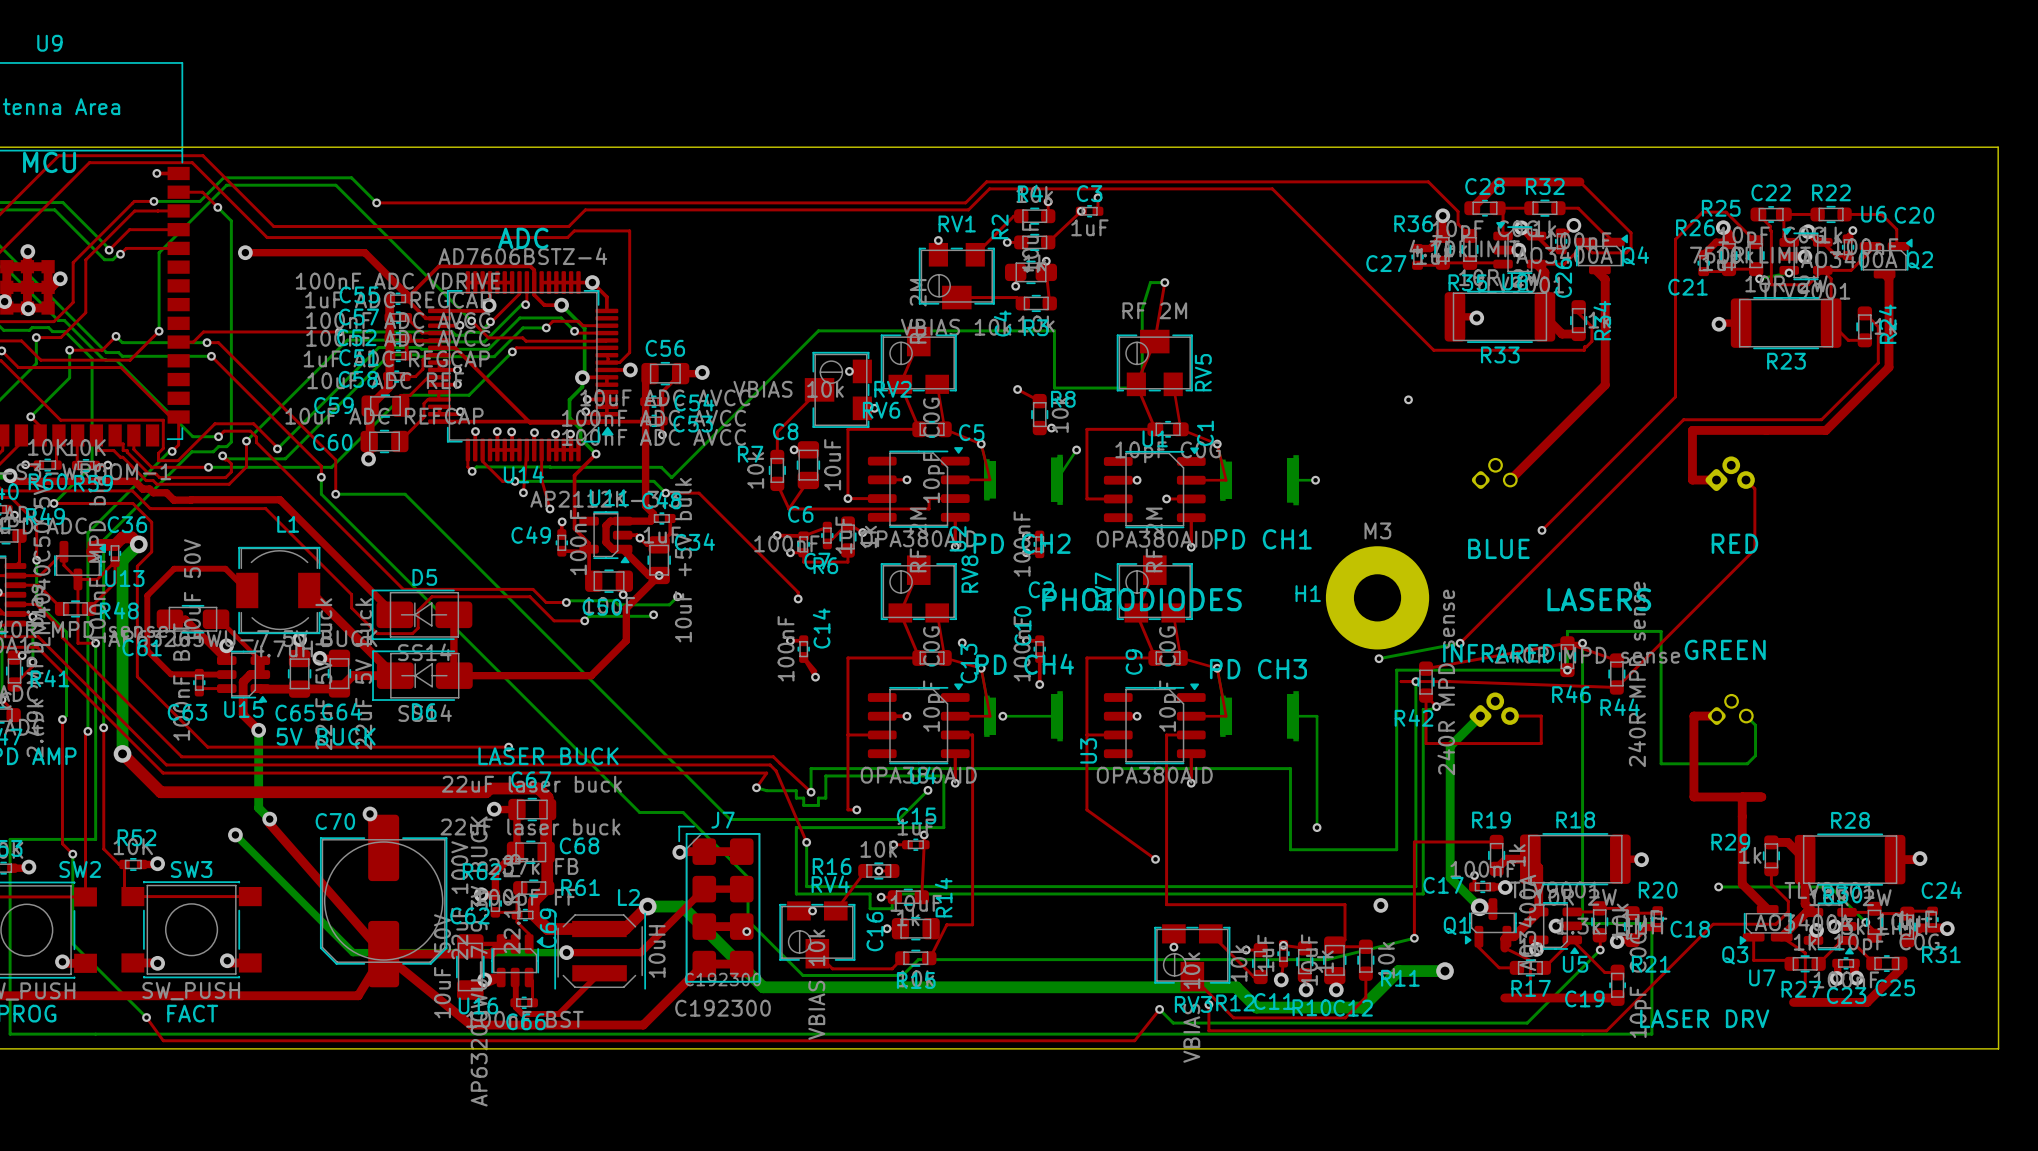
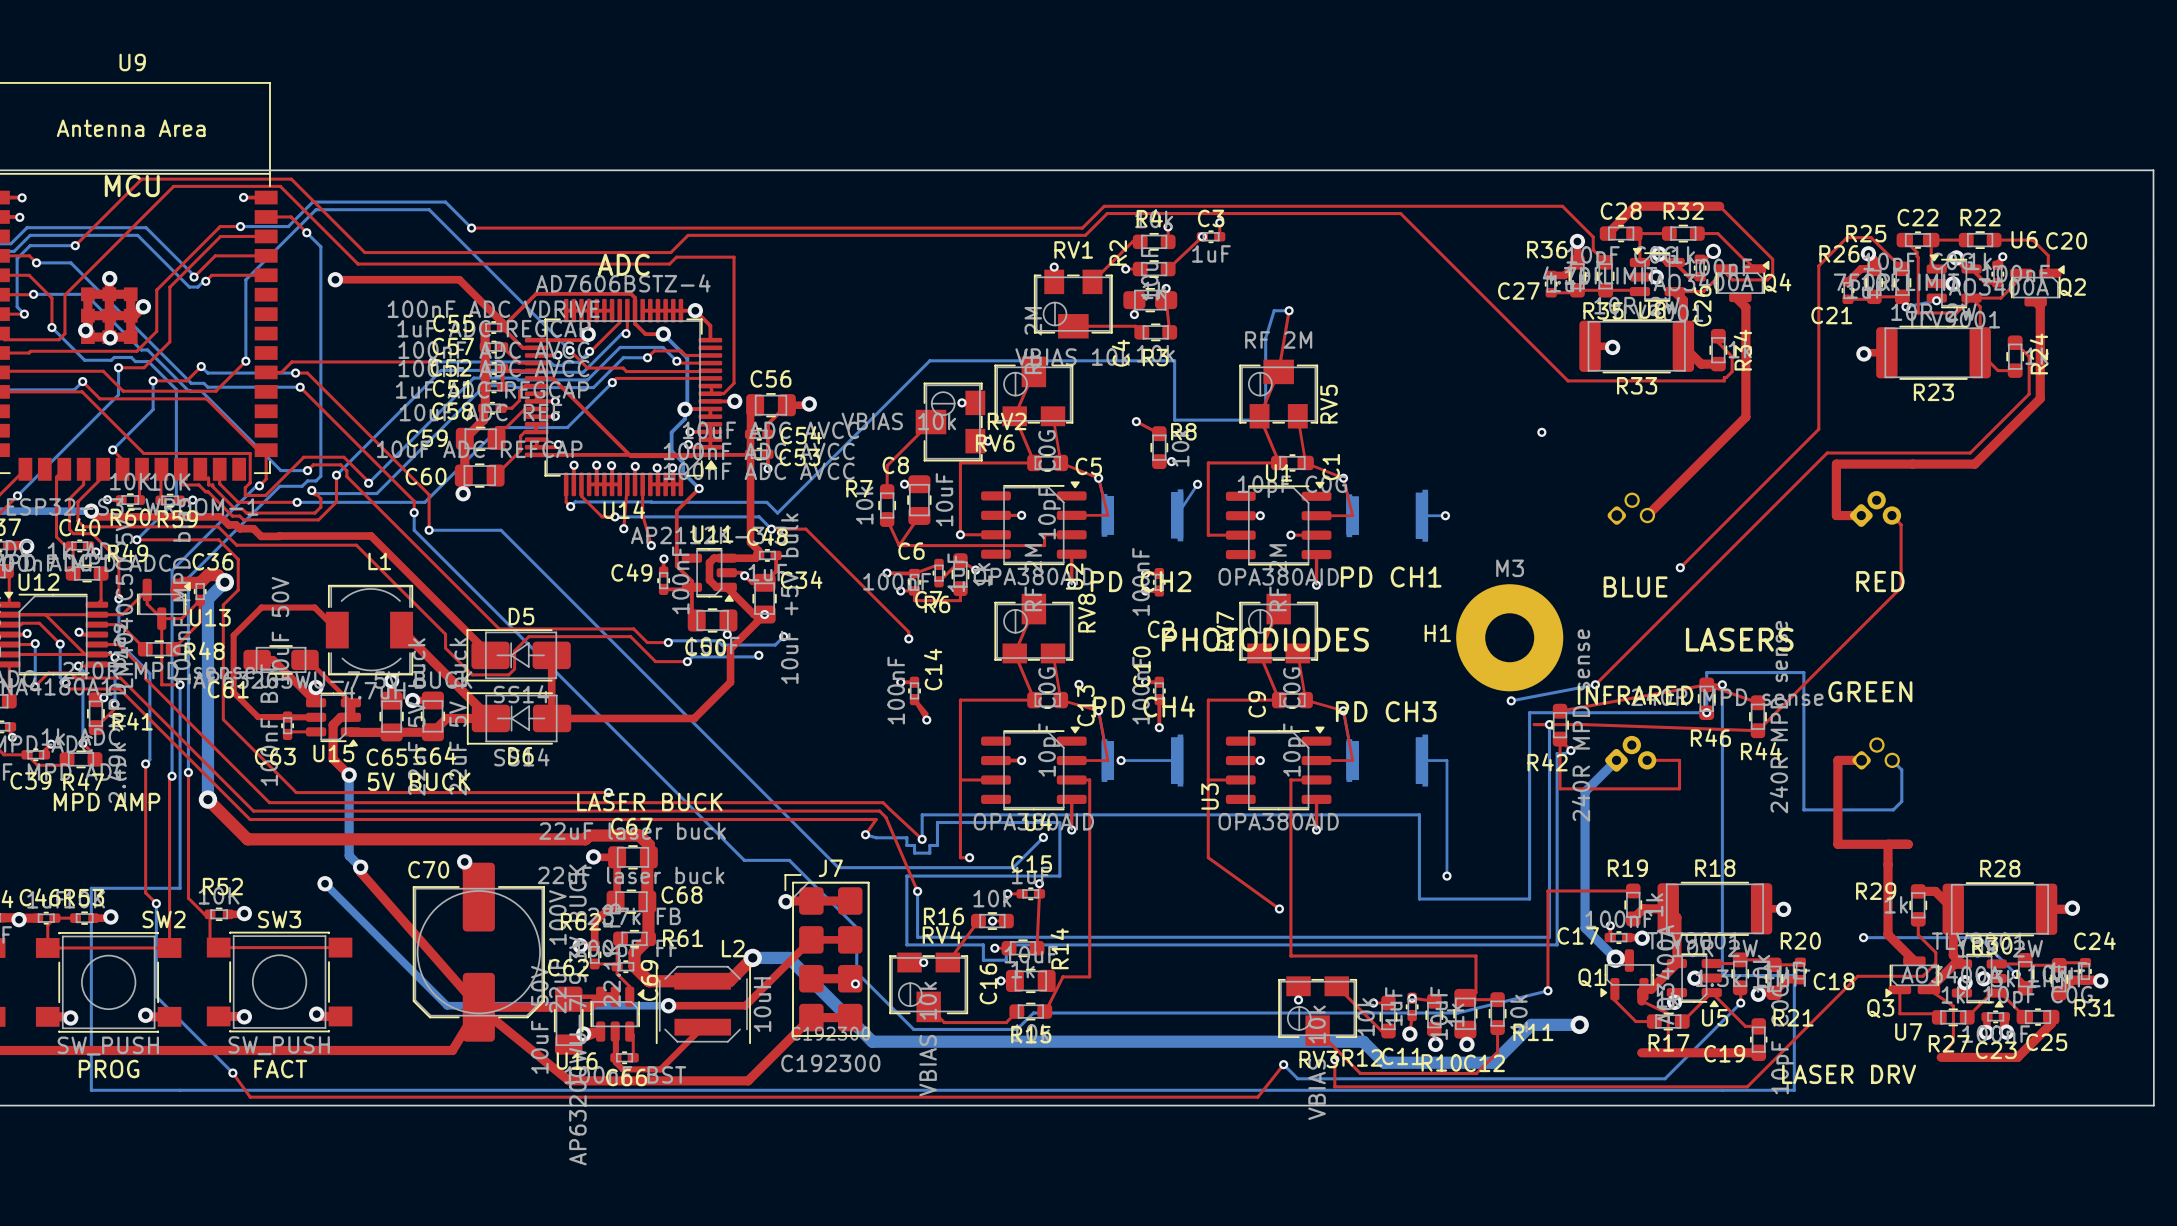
via: (1380, 905) -> none

